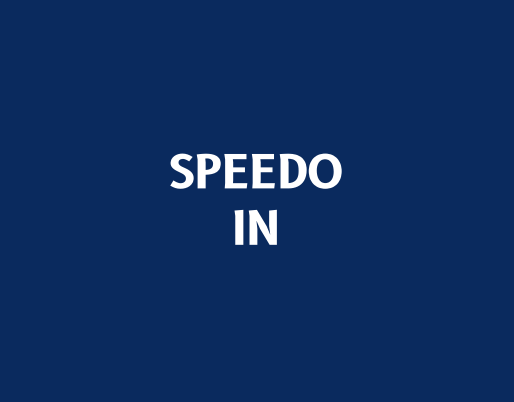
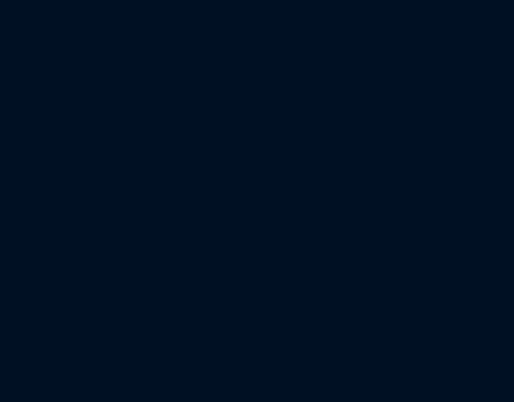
text: SPEEDO (255, 171) -> none
text: IN (255, 227) -> none

